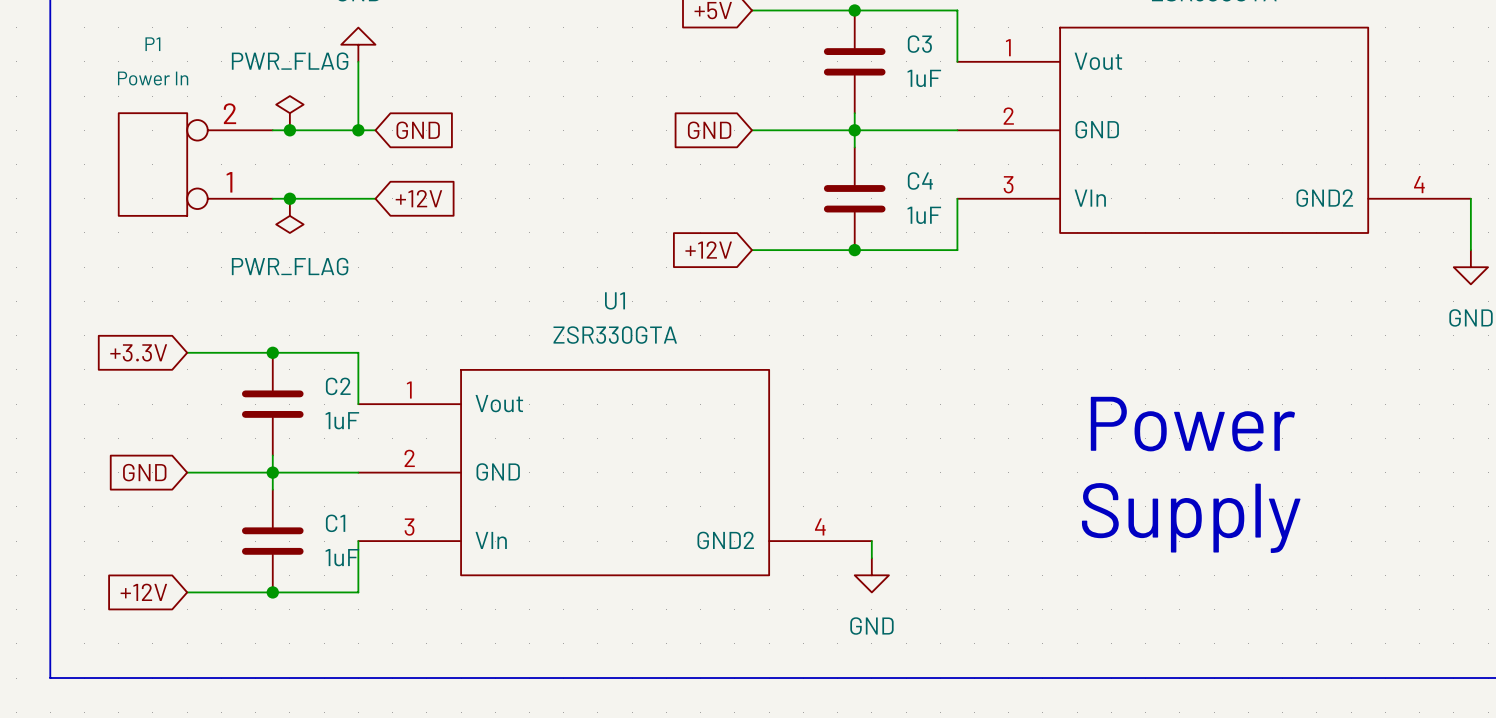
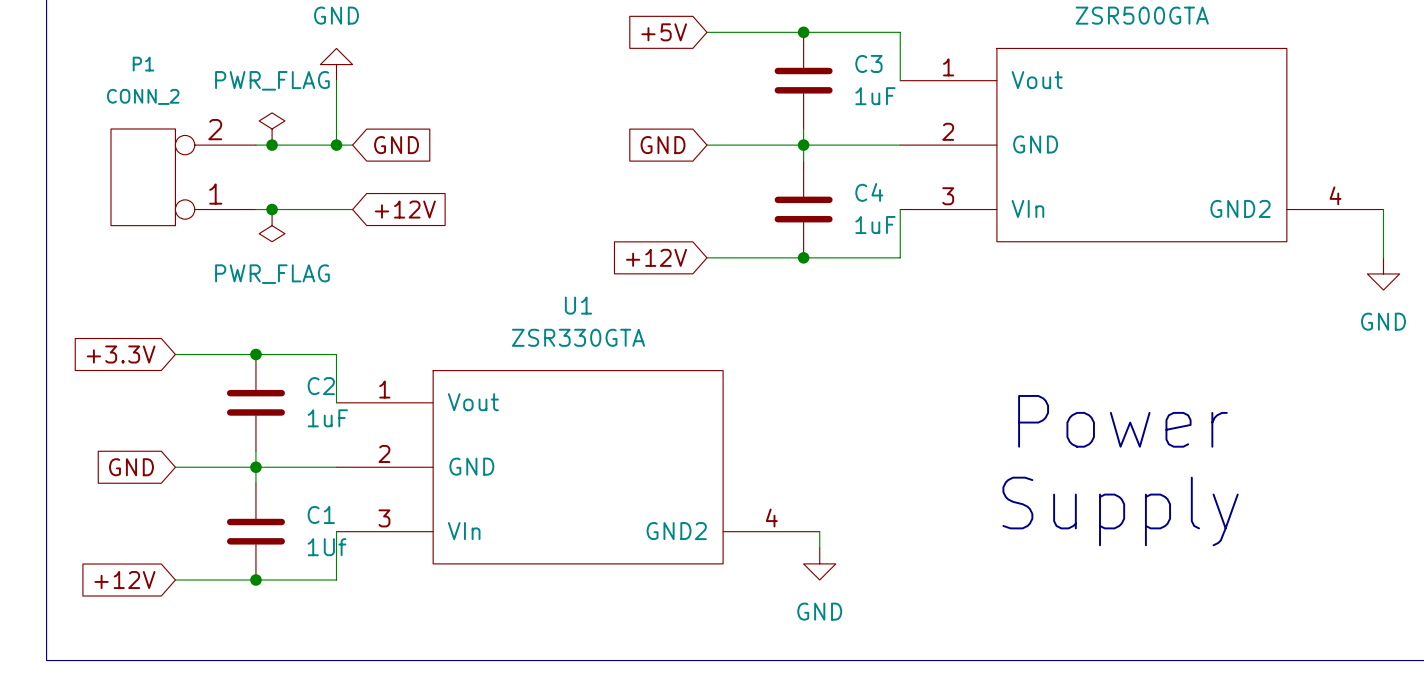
P1 value: Power In (153, 78) -> CONN_2 (143, 96)
C1 value: 1uF (342, 557) -> 1Uf (327, 547)

